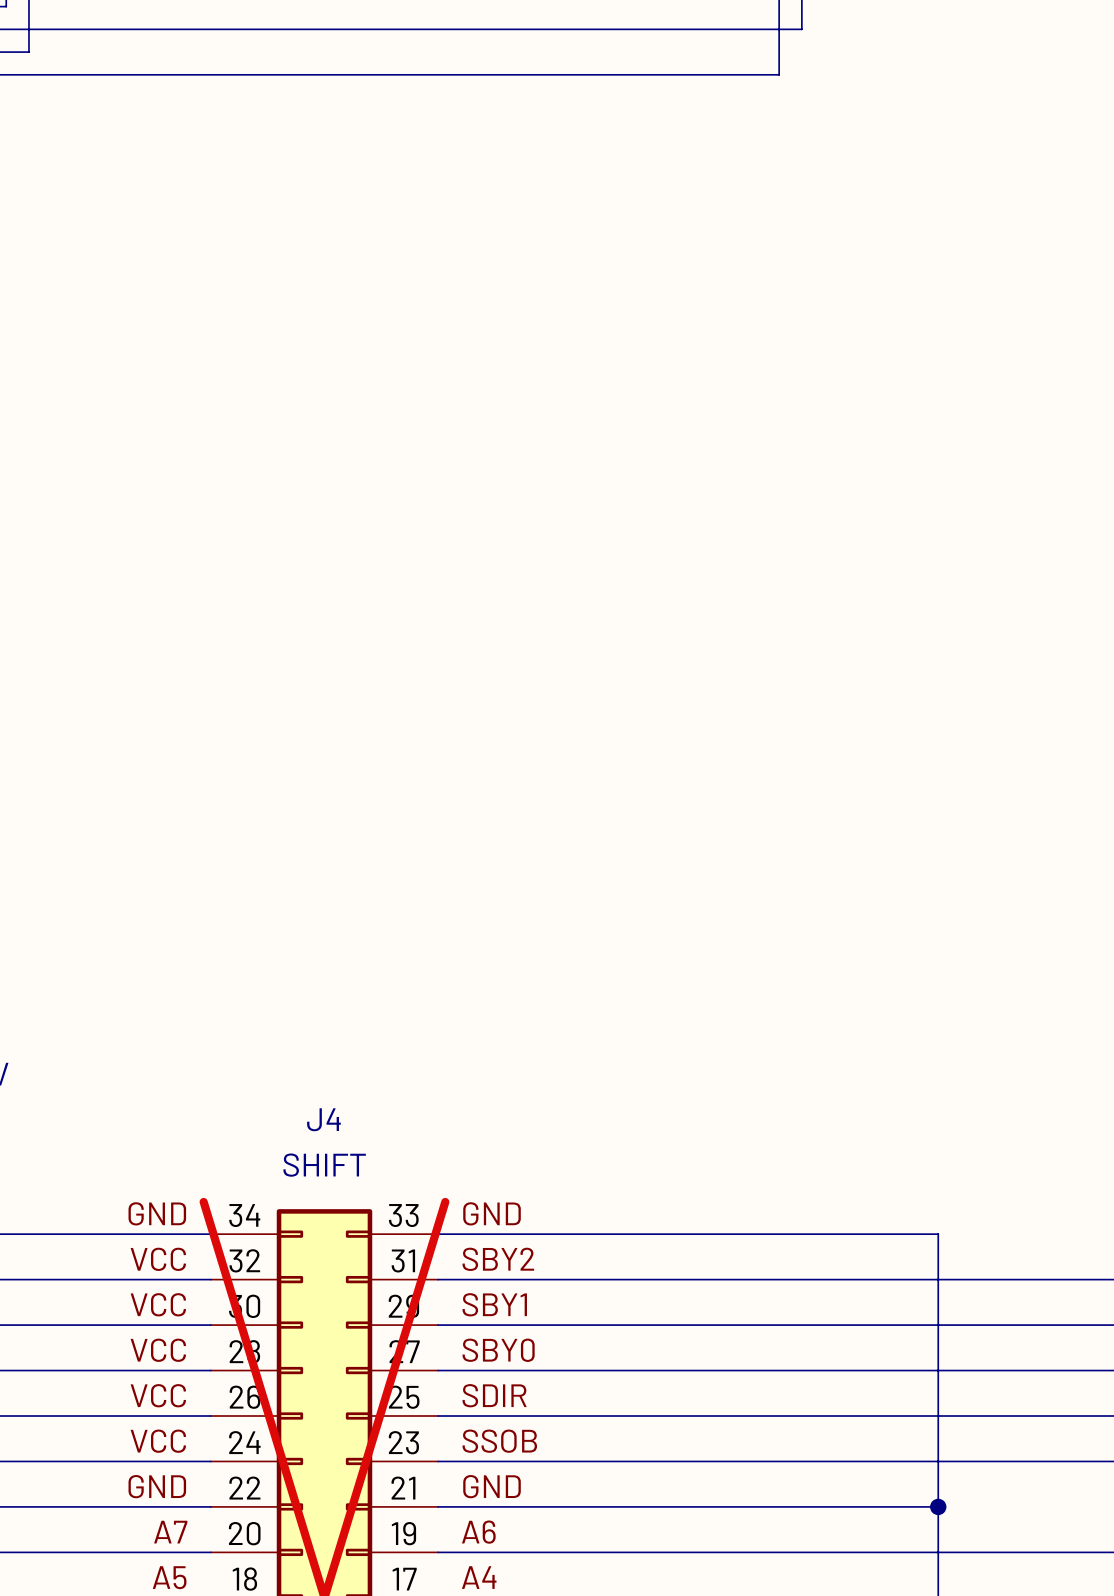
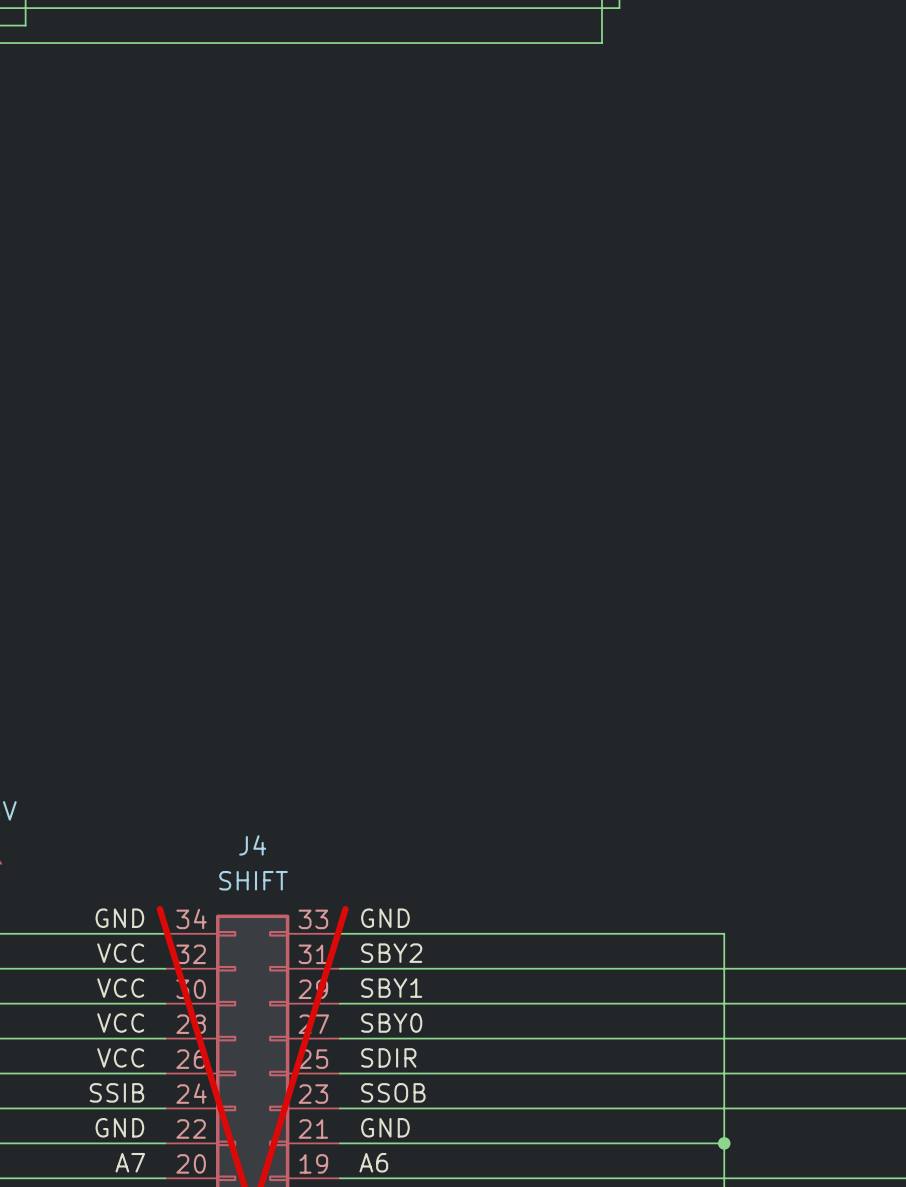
label: VCC (158, 1441) -> SSIB (116, 1092)

